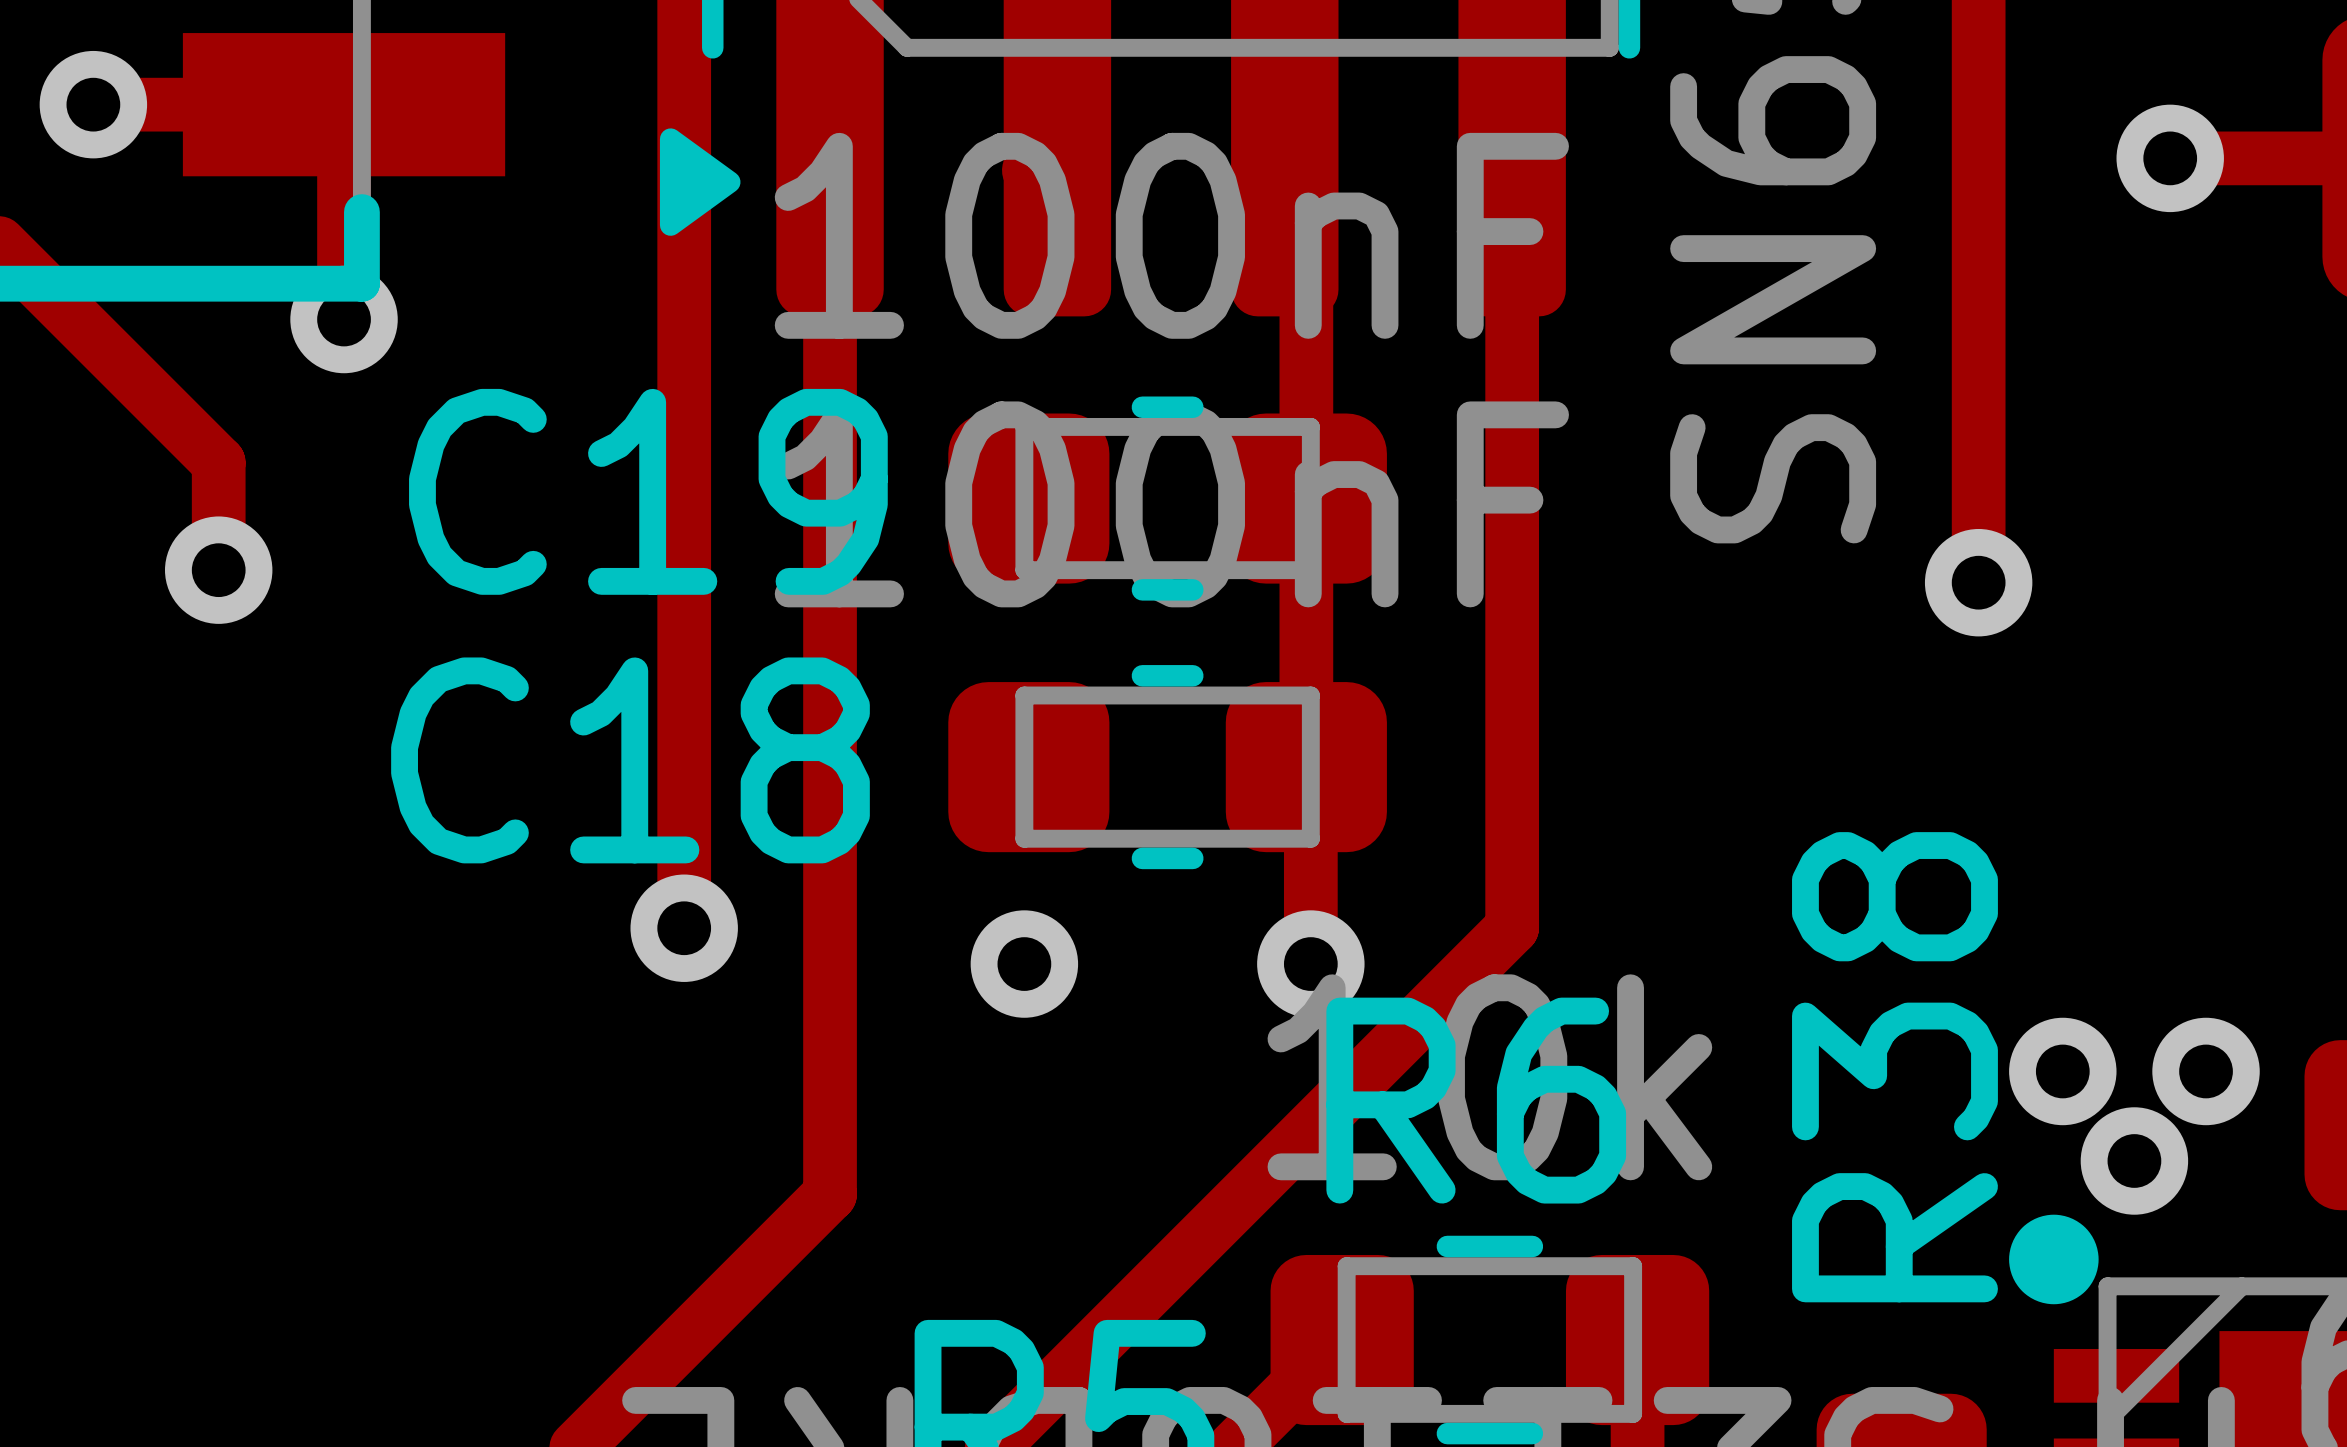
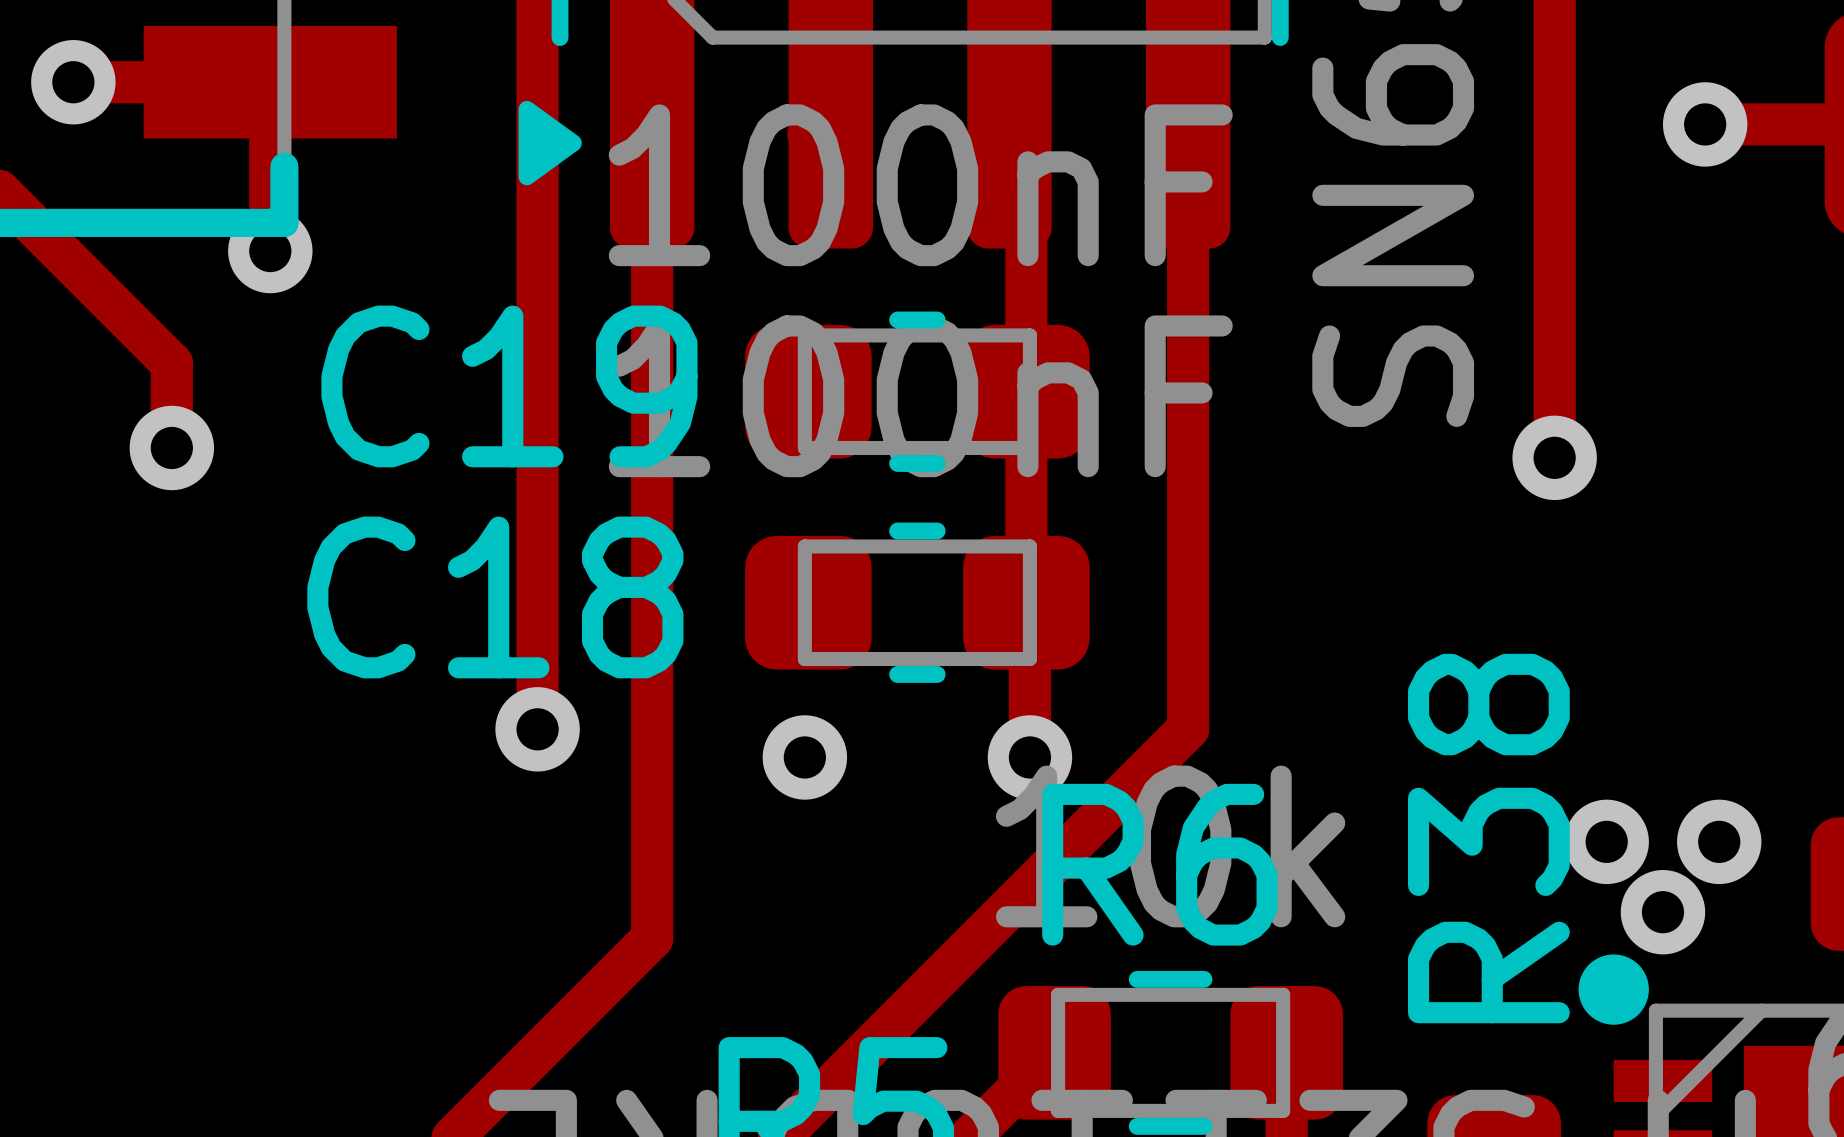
via position: (2062, 1071) -> (1606, 841)
via position: (2206, 1071) -> (1719, 841)
via position: (2134, 1160) -> (1662, 912)

